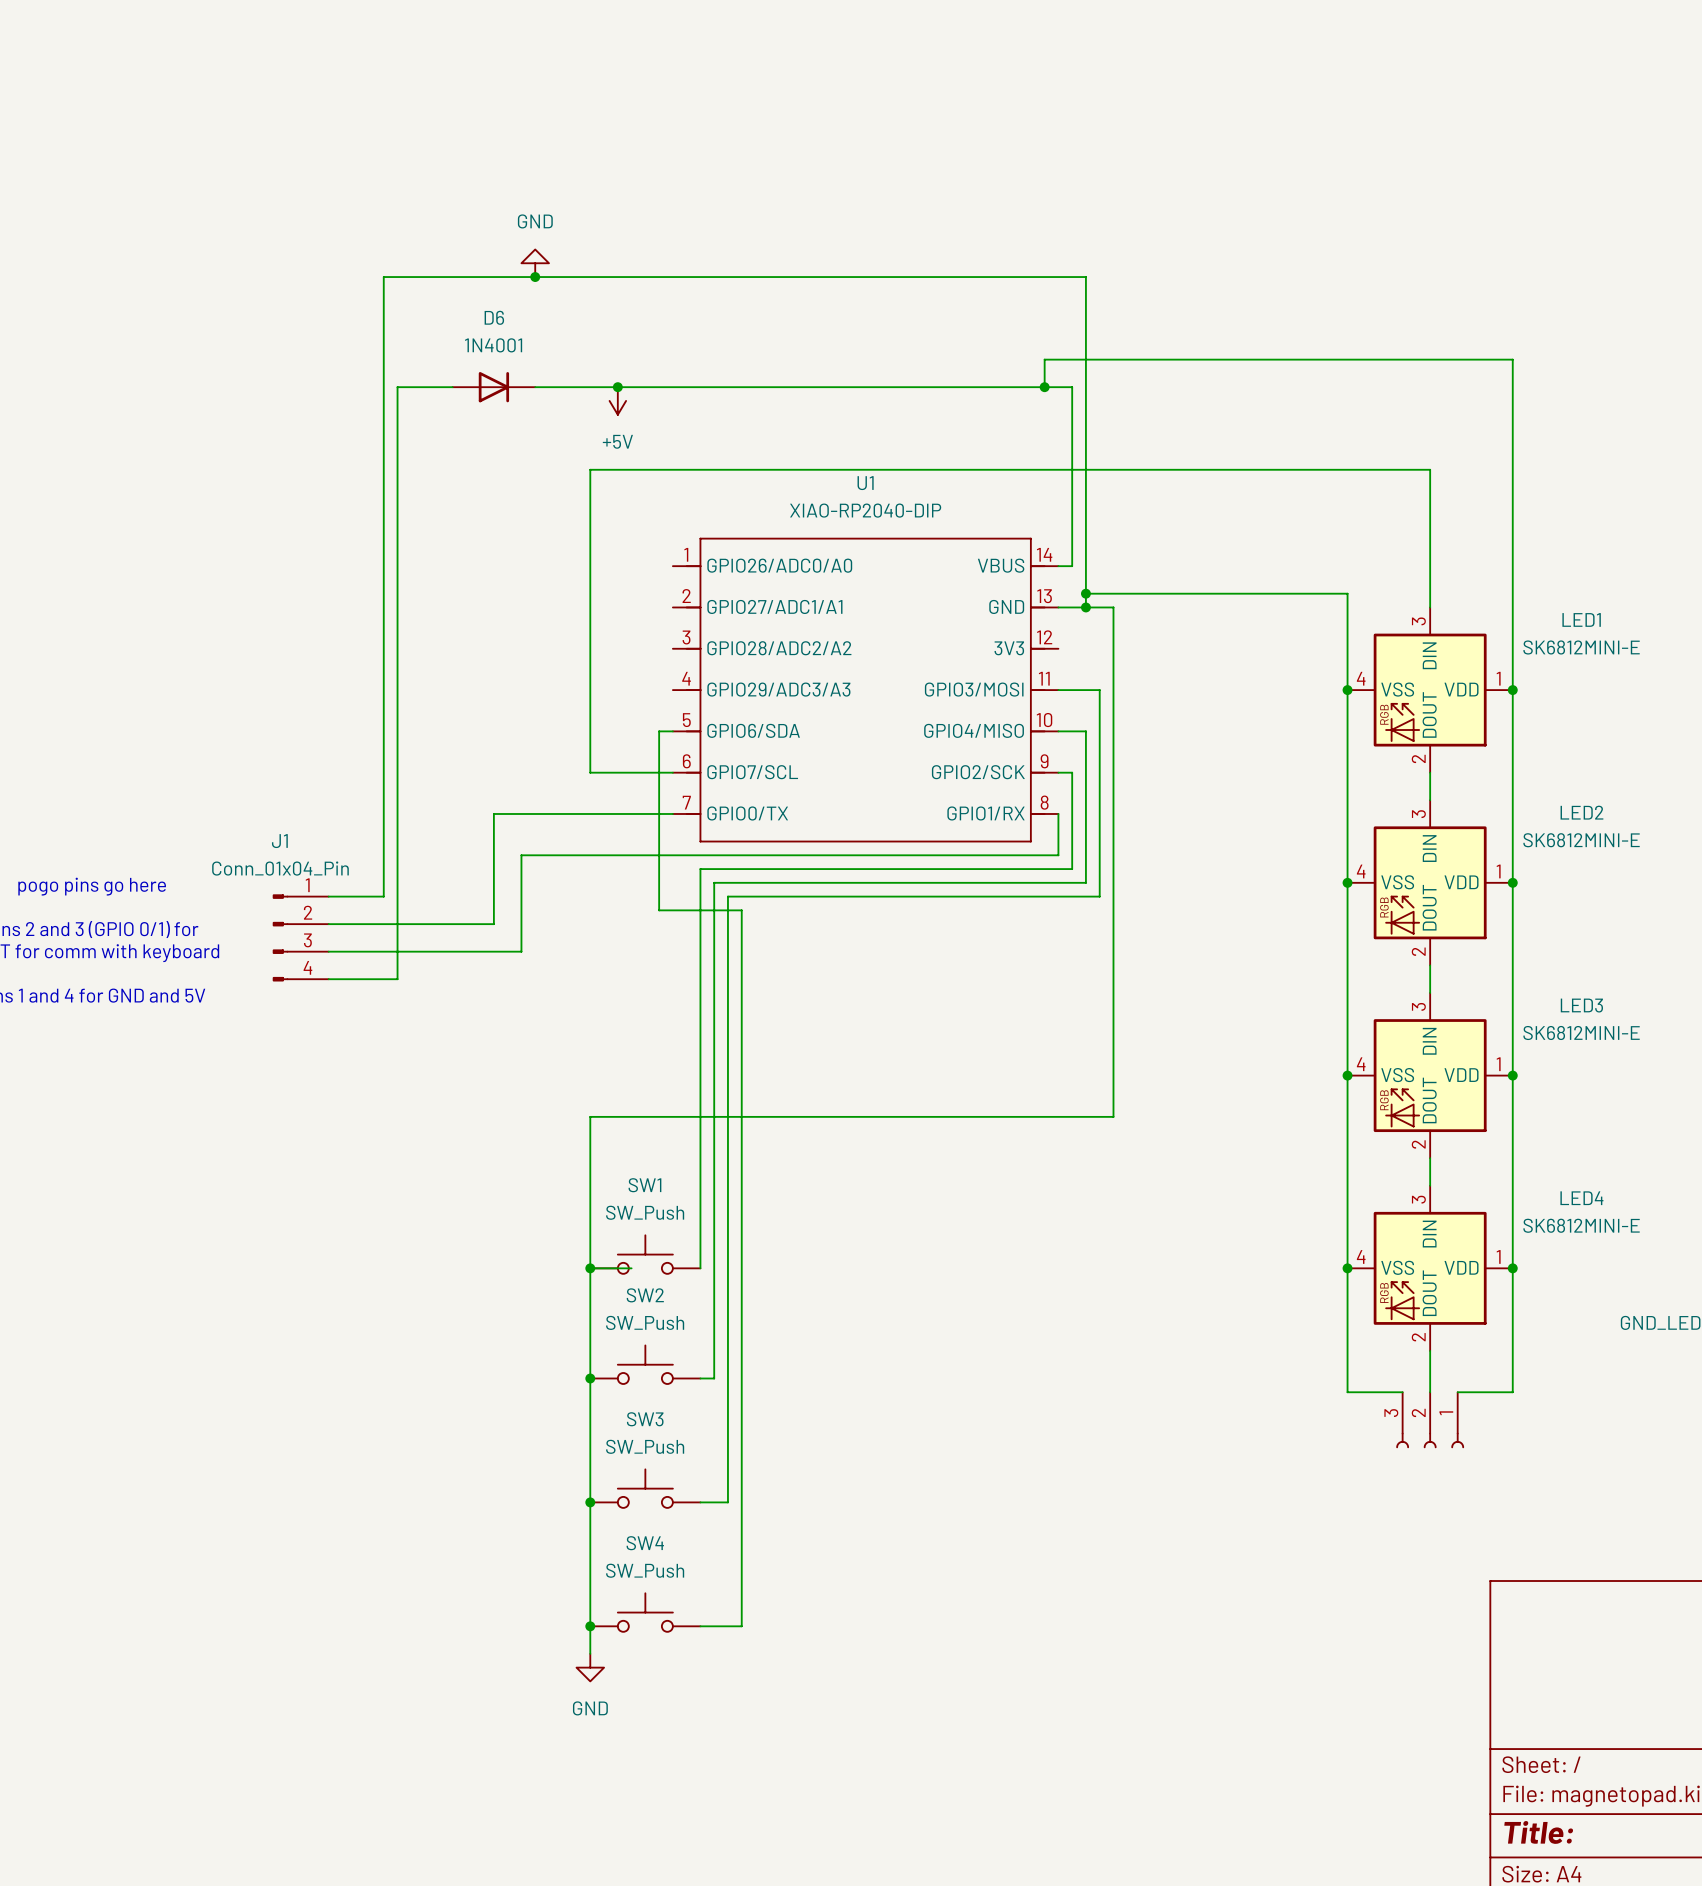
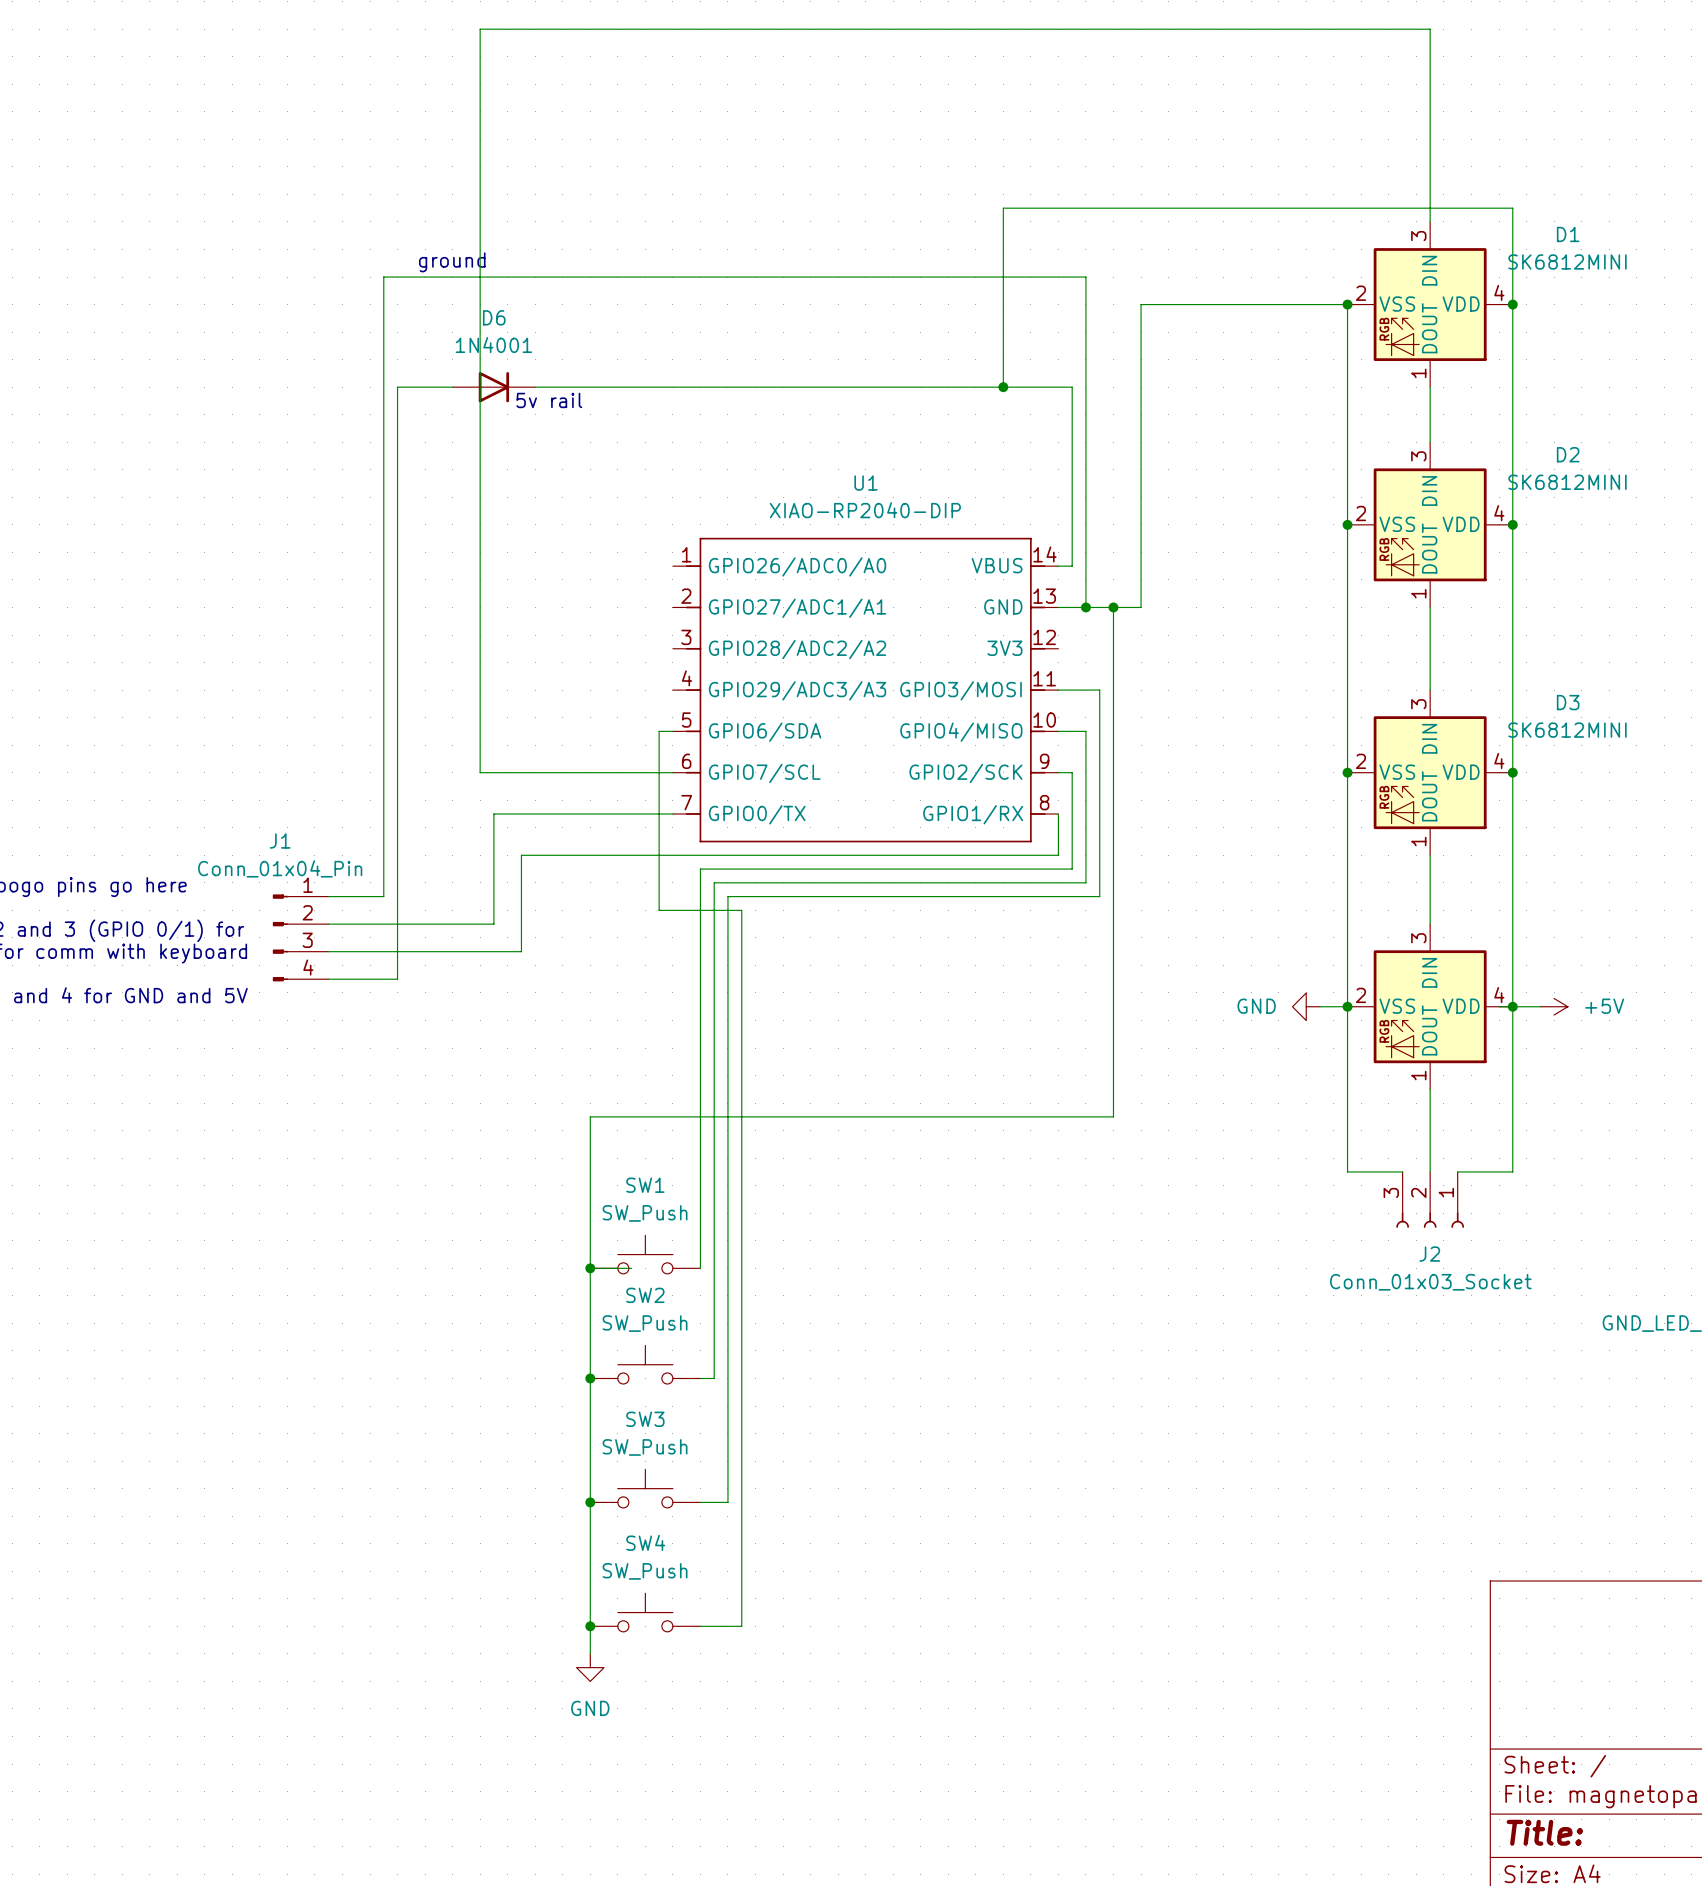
text: none -> ground (452, 262)
power symbol: GND (535, 263) -> none
junction: (535, 277) -> none
junction: none -> (1347, 304)
D1: none -> SK6812MINI (1430, 304)
junction: none -> (1512, 304)
wire: (1512, 359) (1044, 359) (1044, 387) -> (1512, 359) (1512, 208) (1003, 208) (1003, 387)
junction: (617, 387) -> none
junction position: (1044, 387) -> (1003, 387)
wire: none -> (1430, 387) (1430, 442)
text: none -> 5v rail (549, 400)
power symbol: +5V (617, 400) -> none
junction: none -> (1347, 524)
D2: none -> SK6812MINI (1430, 524)
junction: none -> (1512, 524)
wire: (1085, 593) (1347, 593) -> (1113, 607) (1141, 607) (1141, 304) (1347, 304) (1347, 593)
junction position: (1085, 593) -> (1113, 607)
wire: (1430, 607) (1430, 469) (590, 469) (590, 772) -> (1430, 221) (1430, 29) (480, 29) (480, 772) (590, 772)
junction: (1347, 690) -> none
LED1: SK6812MINI-E (1430, 690) -> none
junction: (1512, 690) -> none
junction: none -> (1347, 772)
D3: none -> SK6812MINI (1430, 772)
junction: none -> (1512, 772)
junction: (1347, 882) -> none
LED2: SK6812MINI-E (1430, 882) -> none
junction: (1512, 882) -> none
power symbol: none -> GND (1306, 1006)
wire: none -> (1320, 1006) (1347, 1006)
junction: none -> (1347, 1006)
part: none -> (1430, 1006)
wire: none -> (1499, 1006) (1540, 1006)
junction: none -> (1512, 1006)
power symbol: none -> +5V (1554, 1006)
junction: (1347, 1075) -> none
LED3: SK6812MINI-E (1430, 1075) -> none
junction: (1512, 1075) -> none
wire: (1347, 1171) (1347, 1392) (1402, 1392) -> (1347, 1171) (1402, 1171)
wire: (1512, 1171) (1512, 1392) (1457, 1392) -> (1512, 1171) (1457, 1171)
J2: none -> Conn_01x03_Socket (1430, 1199)
junction: (1347, 1268) -> none
LED4: SK6812MINI-E (1430, 1268) -> none
junction: (1512, 1268) -> none
wire: (1430, 1350) (1430, 1392) -> none
part: (1430, 1420) -> none

